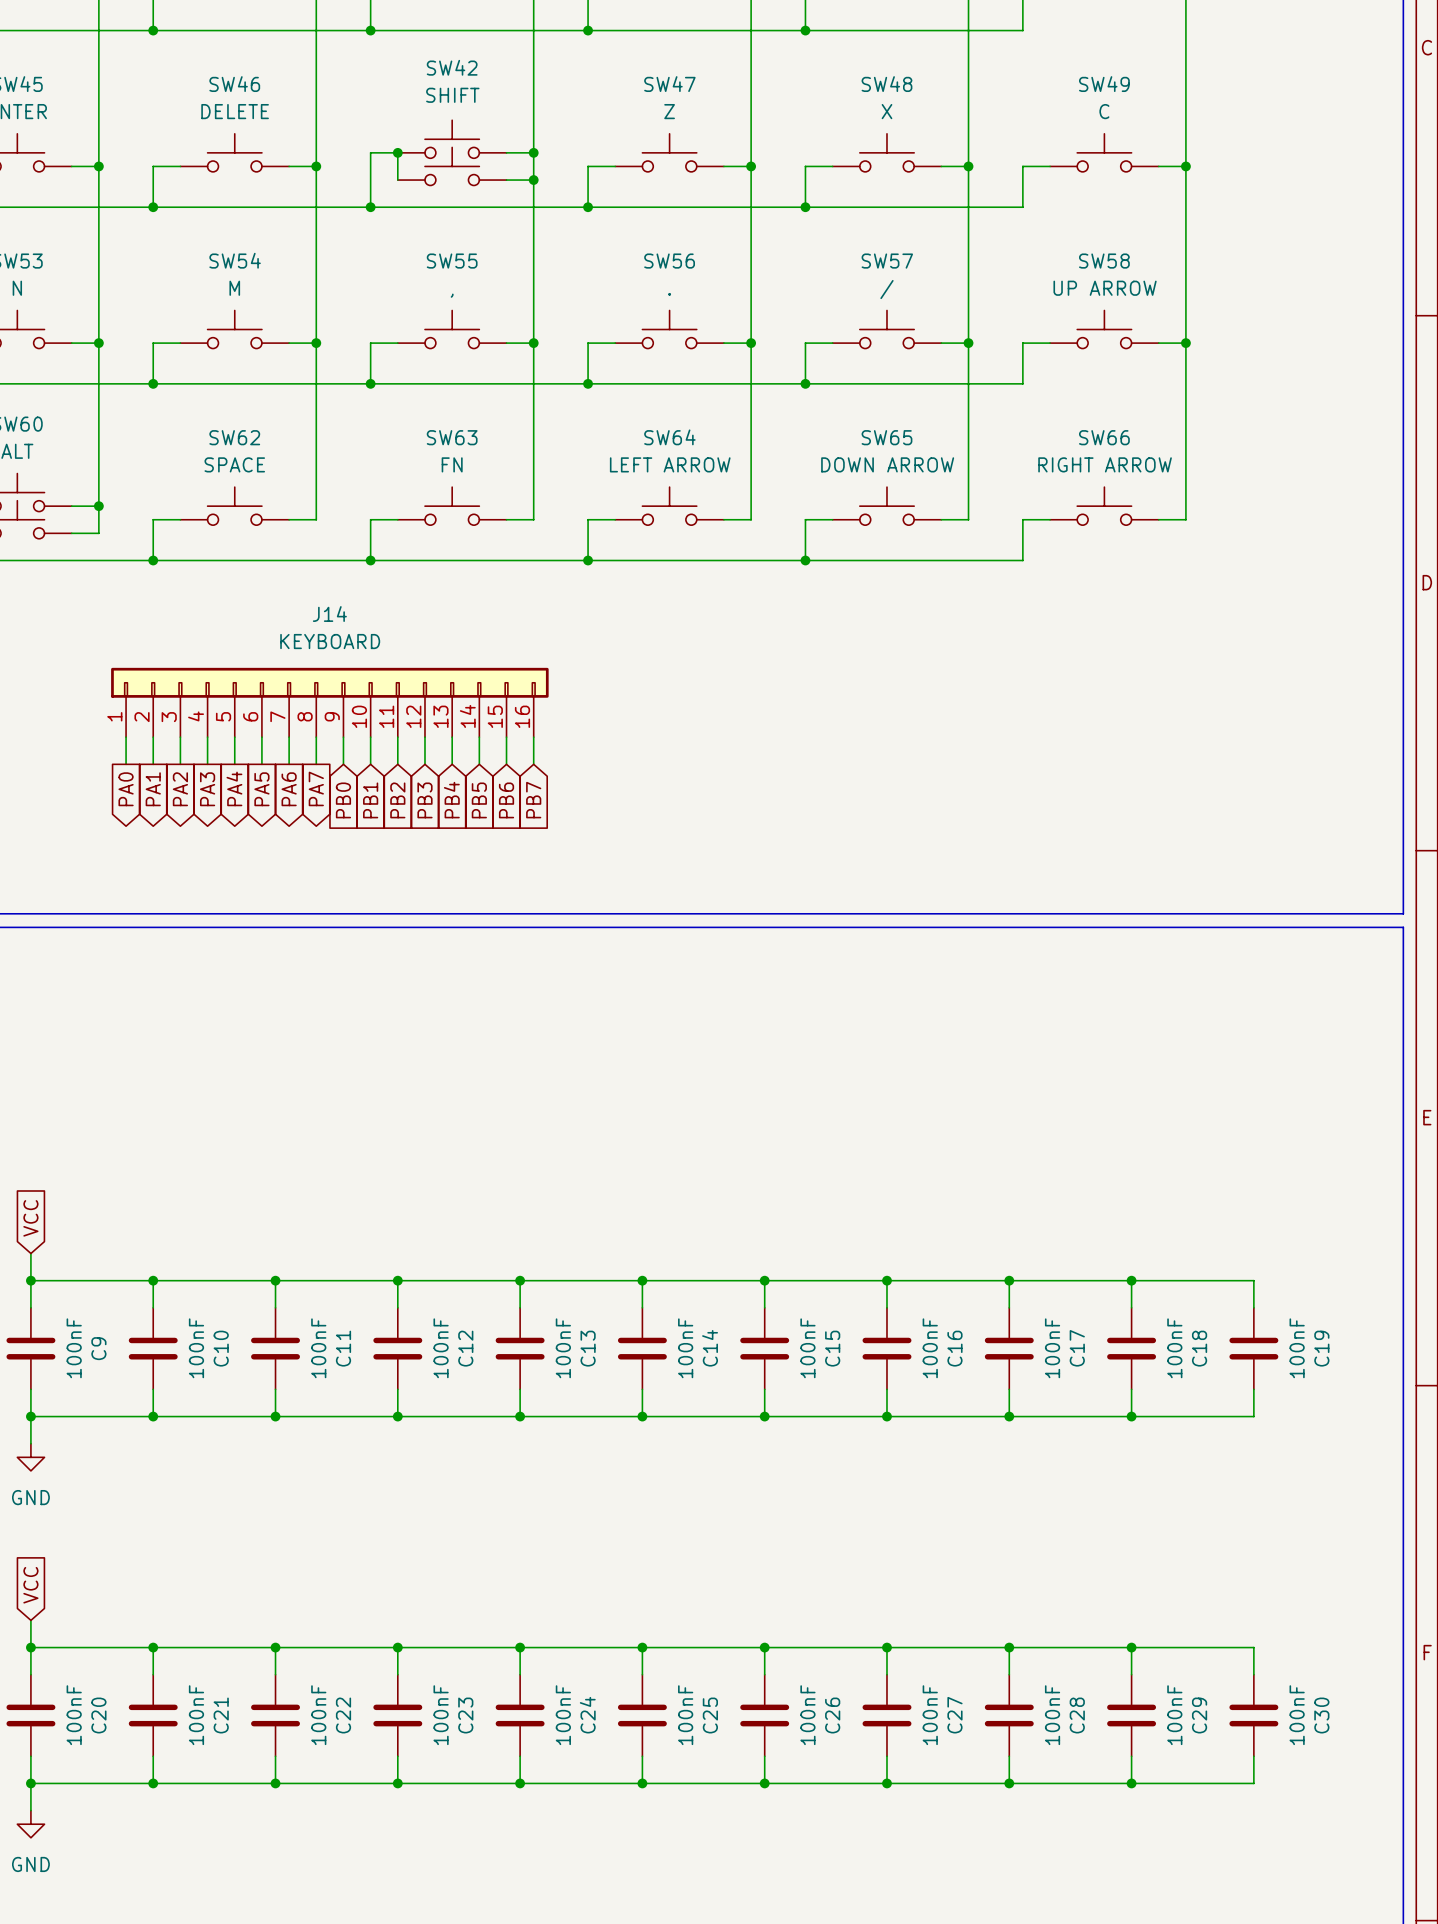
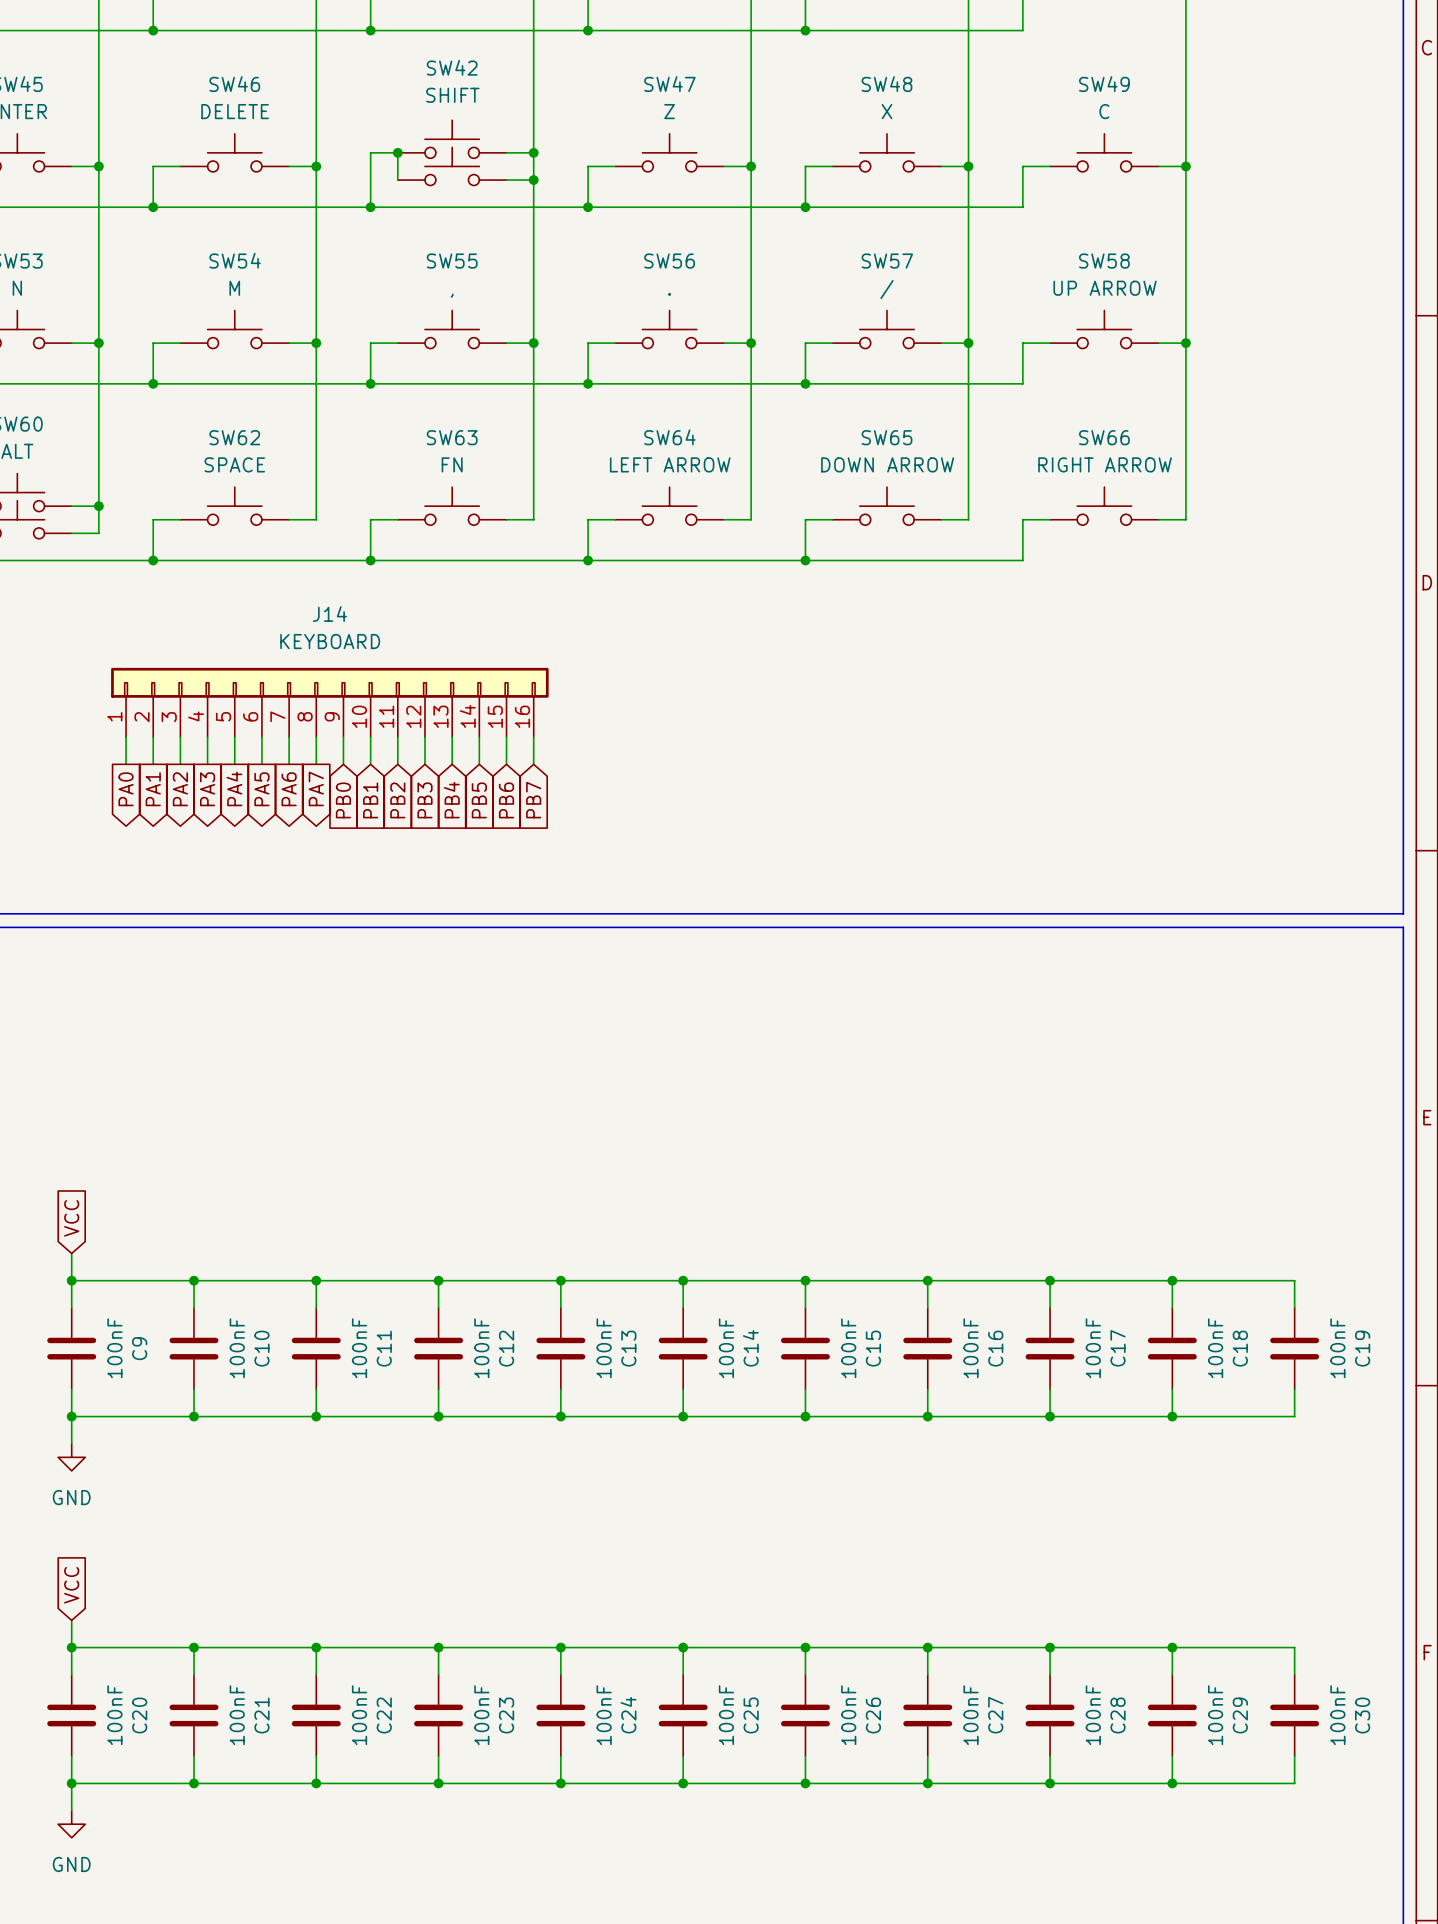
global label position: VCC (30, 1218) -> VCC (71, 1218)
wire: (30, 1253) (30, 1307) -> (71, 1253) (71, 1307)
wire: (30, 1280) (71, 1280) -> none
junction: (30, 1280) -> none
junction: none -> (71, 1280)
wire: (153, 1280) (153, 1307) -> (193, 1280) (193, 1307)
junction: (153, 1280) -> none
junction: none -> (193, 1280)
wire: (275, 1280) (275, 1307) -> (316, 1280) (316, 1307)
junction: (275, 1280) -> none
junction: none -> (316, 1280)
wire: (397, 1280) (397, 1307) -> (438, 1280) (438, 1307)
junction: (397, 1280) -> none
junction: none -> (438, 1280)
wire: (520, 1280) (520, 1307) -> (560, 1280) (560, 1307)
junction: (520, 1280) -> none
junction: none -> (560, 1280)
wire: (642, 1280) (642, 1307) -> (683, 1280) (683, 1307)
junction: (642, 1280) -> none
junction: none -> (683, 1280)
wire: (764, 1280) (764, 1307) -> (805, 1280) (805, 1307)
junction: (764, 1280) -> none
junction: none -> (805, 1280)
wire: (886, 1280) (886, 1307) -> (927, 1280) (927, 1307)
junction: (886, 1280) -> none
junction: none -> (927, 1280)
wire: (1009, 1280) (1009, 1307) -> (1050, 1280) (1050, 1307)
junction: (1009, 1280) -> none
junction: none -> (1050, 1280)
wire: (1131, 1280) (1131, 1307) -> (1172, 1280) (1172, 1307)
junction: (1131, 1280) -> none
junction: none -> (1172, 1280)
wire: (1253, 1280) (1253, 1307) -> (1253, 1280) (1294, 1280) (1294, 1307)
C9 position: (30, 1348) -> (71, 1348)
C10 position: (153, 1348) -> (193, 1348)
C11 position: (275, 1348) -> (316, 1348)
C12 position: (397, 1348) -> (438, 1348)
C13 position: (520, 1348) -> (560, 1348)
C14 position: (642, 1348) -> (683, 1348)
C15 position: (764, 1348) -> (805, 1348)
C16 position: (886, 1348) -> (927, 1348)
C17 position: (1009, 1348) -> (1050, 1348)
C18 position: (1131, 1348) -> (1172, 1348)
C19 position: (1253, 1348) -> (1294, 1348)
wire: (30, 1389) (30, 1443) -> (71, 1389) (71, 1443)
wire: (153, 1389) (153, 1416) -> (193, 1389) (193, 1416)
wire: (275, 1389) (275, 1416) -> (316, 1389) (316, 1416)
wire: (397, 1389) (397, 1416) -> (438, 1389) (438, 1416)
wire: (520, 1389) (520, 1416) -> (560, 1389) (560, 1416)
wire: (642, 1389) (642, 1416) -> (683, 1389) (683, 1416)
wire: (764, 1389) (764, 1416) -> (805, 1389) (805, 1416)
wire: (886, 1389) (886, 1416) -> (927, 1389) (927, 1416)
wire: (1009, 1389) (1009, 1416) -> (1050, 1389) (1050, 1416)
wire: (1131, 1389) (1131, 1416) -> (1172, 1389) (1172, 1416)
wire: (1253, 1389) (1253, 1416) -> (1294, 1389) (1294, 1416) (1253, 1416)
wire: (30, 1416) (71, 1416) -> none
junction: (30, 1416) -> none
junction: none -> (71, 1416)
junction: (153, 1416) -> none
junction: none -> (193, 1416)
junction: (275, 1416) -> none
junction: none -> (316, 1416)
junction: (397, 1416) -> none
junction: none -> (438, 1416)
junction: (520, 1416) -> none
junction: none -> (560, 1416)
junction: (642, 1416) -> none
junction: none -> (683, 1416)
junction: (764, 1416) -> none
junction: none -> (805, 1416)
junction: (886, 1416) -> none
junction: none -> (927, 1416)
junction: (1009, 1416) -> none
junction: none -> (1050, 1416)
junction: (1131, 1416) -> none
junction: none -> (1172, 1416)
power symbol position: GND (30, 1457) -> GND (71, 1457)
global label position: VCC (30, 1585) -> VCC (71, 1585)
wire: (30, 1620) (30, 1674) -> (71, 1620) (71, 1674)
wire: (30, 1647) (71, 1647) -> none
junction: (30, 1647) -> none
junction: none -> (71, 1647)
wire: (153, 1647) (153, 1674) -> (193, 1647) (193, 1674)
junction: (153, 1647) -> none
junction: none -> (193, 1647)
wire: (275, 1647) (275, 1674) -> (316, 1647) (316, 1674)
junction: (275, 1647) -> none
junction: none -> (316, 1647)
wire: (397, 1647) (397, 1674) -> (438, 1647) (438, 1674)
junction: (397, 1647) -> none
junction: none -> (438, 1647)
wire: (520, 1647) (520, 1674) -> (560, 1647) (560, 1674)
junction: (520, 1647) -> none
junction: none -> (560, 1647)
wire: (642, 1647) (642, 1674) -> (683, 1647) (683, 1674)
junction: (642, 1647) -> none
junction: none -> (683, 1647)
wire: (764, 1647) (764, 1674) -> (805, 1647) (805, 1674)
junction: (764, 1647) -> none
junction: none -> (805, 1647)
wire: (886, 1647) (886, 1674) -> (927, 1647) (927, 1674)
junction: (886, 1647) -> none
junction: none -> (927, 1647)
wire: (1009, 1647) (1009, 1674) -> (1050, 1647) (1050, 1674)
junction: (1009, 1647) -> none
junction: none -> (1050, 1647)
wire: (1131, 1647) (1131, 1674) -> (1172, 1647) (1172, 1674)
junction: (1131, 1647) -> none
junction: none -> (1172, 1647)
wire: (1253, 1647) (1253, 1674) -> (1253, 1647) (1294, 1647) (1294, 1674)
C20 position: (30, 1715) -> (71, 1715)
C21 position: (153, 1715) -> (193, 1715)
C22 position: (275, 1715) -> (316, 1715)
C23 position: (397, 1715) -> (438, 1715)
C24 position: (520, 1715) -> (560, 1715)
C25 position: (642, 1715) -> (683, 1715)
C26 position: (764, 1715) -> (805, 1715)
C27 position: (886, 1715) -> (927, 1715)
C28 position: (1009, 1715) -> (1050, 1715)
C29 position: (1131, 1715) -> (1172, 1715)
C30 position: (1253, 1715) -> (1294, 1715)
wire: (30, 1756) (30, 1810) -> (71, 1756) (71, 1810)
wire: (153, 1756) (153, 1783) -> (193, 1756) (193, 1783)
wire: (275, 1756) (275, 1783) -> (316, 1756) (316, 1783)
wire: (397, 1756) (397, 1783) -> (438, 1756) (438, 1783)
wire: (520, 1756) (520, 1783) -> (560, 1756) (560, 1783)
wire: (642, 1756) (642, 1783) -> (683, 1756) (683, 1783)
wire: (764, 1756) (764, 1783) -> (805, 1756) (805, 1783)
wire: (886, 1756) (886, 1783) -> (927, 1756) (927, 1783)
wire: (1009, 1756) (1009, 1783) -> (1050, 1756) (1050, 1783)
wire: (1131, 1756) (1131, 1783) -> (1172, 1756) (1172, 1783)
wire: (1253, 1756) (1253, 1783) -> (1294, 1756) (1294, 1783) (1253, 1783)
wire: (30, 1783) (71, 1783) -> none
junction: (30, 1783) -> none
junction: none -> (71, 1783)
junction: (153, 1783) -> none
junction: none -> (193, 1783)
junction: (275, 1783) -> none
junction: none -> (316, 1783)
junction: (397, 1783) -> none
junction: none -> (438, 1783)
junction: (520, 1783) -> none
junction: none -> (560, 1783)
junction: (642, 1783) -> none
junction: none -> (683, 1783)
junction: (764, 1783) -> none
junction: none -> (805, 1783)
junction: (886, 1783) -> none
junction: none -> (927, 1783)
junction: (1009, 1783) -> none
junction: none -> (1050, 1783)
junction: (1131, 1783) -> none
junction: none -> (1172, 1783)
power symbol position: GND (30, 1824) -> GND (71, 1824)

